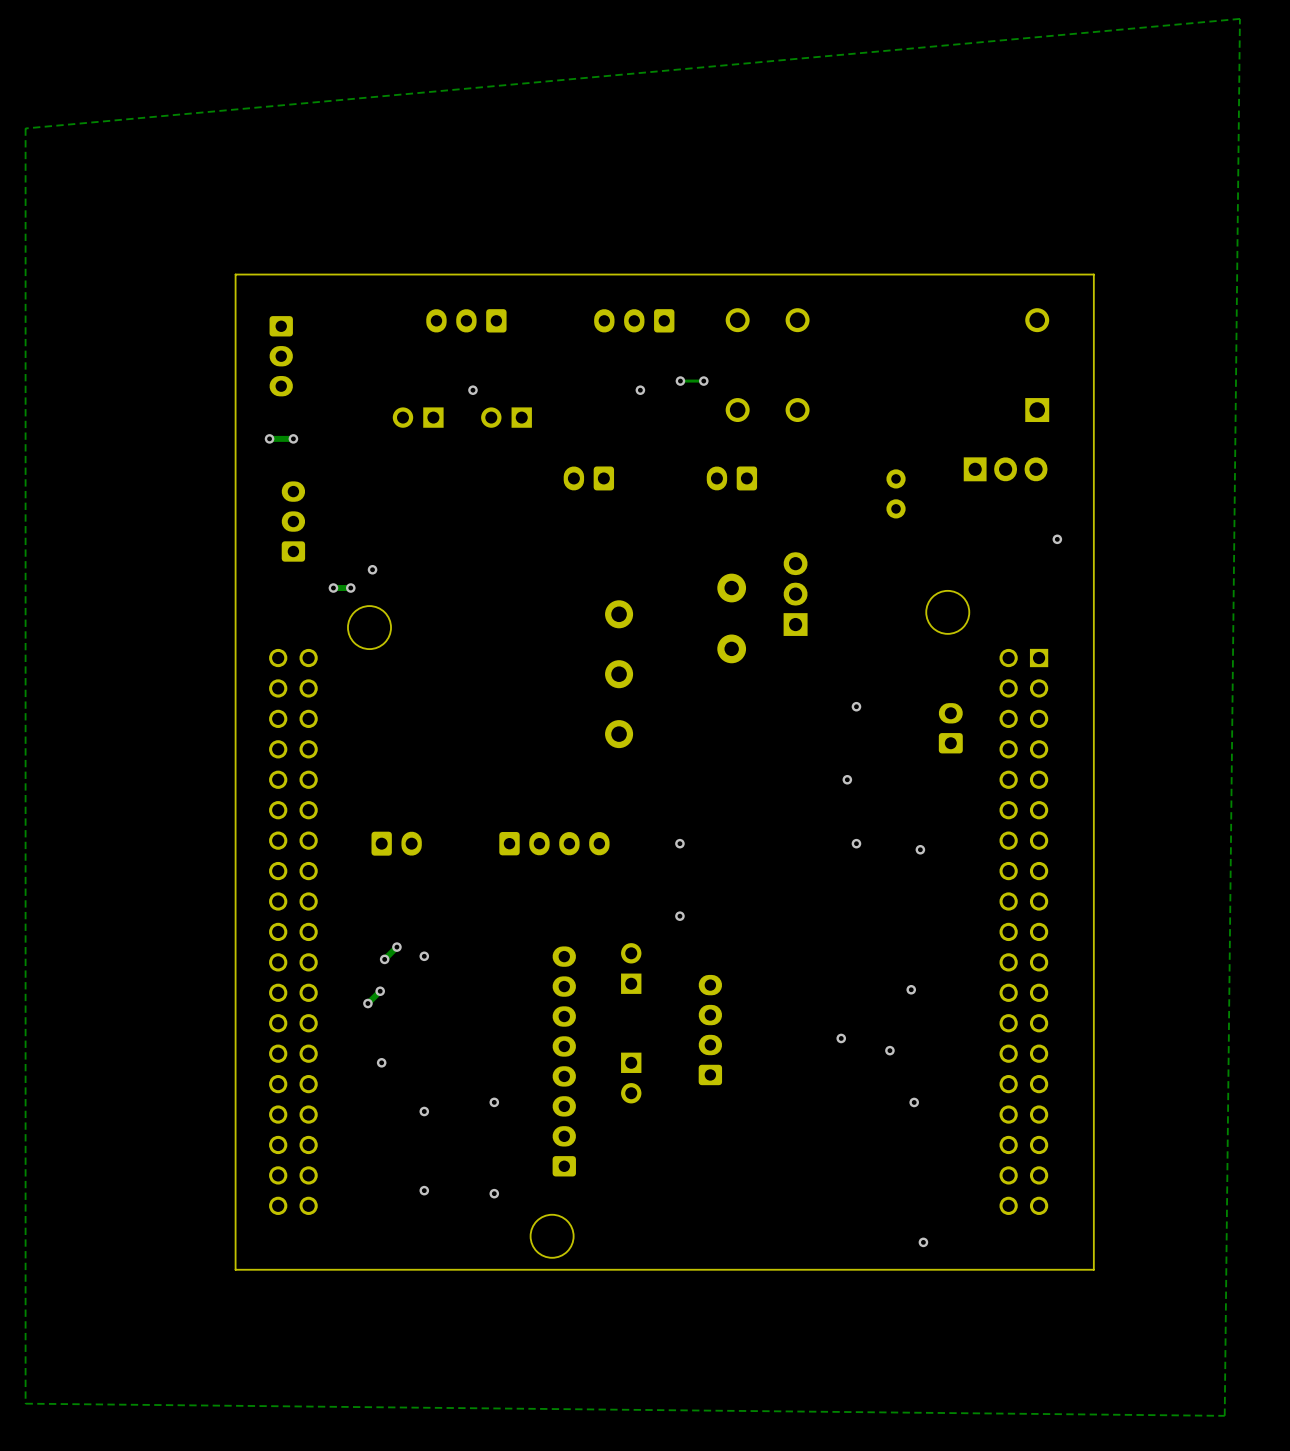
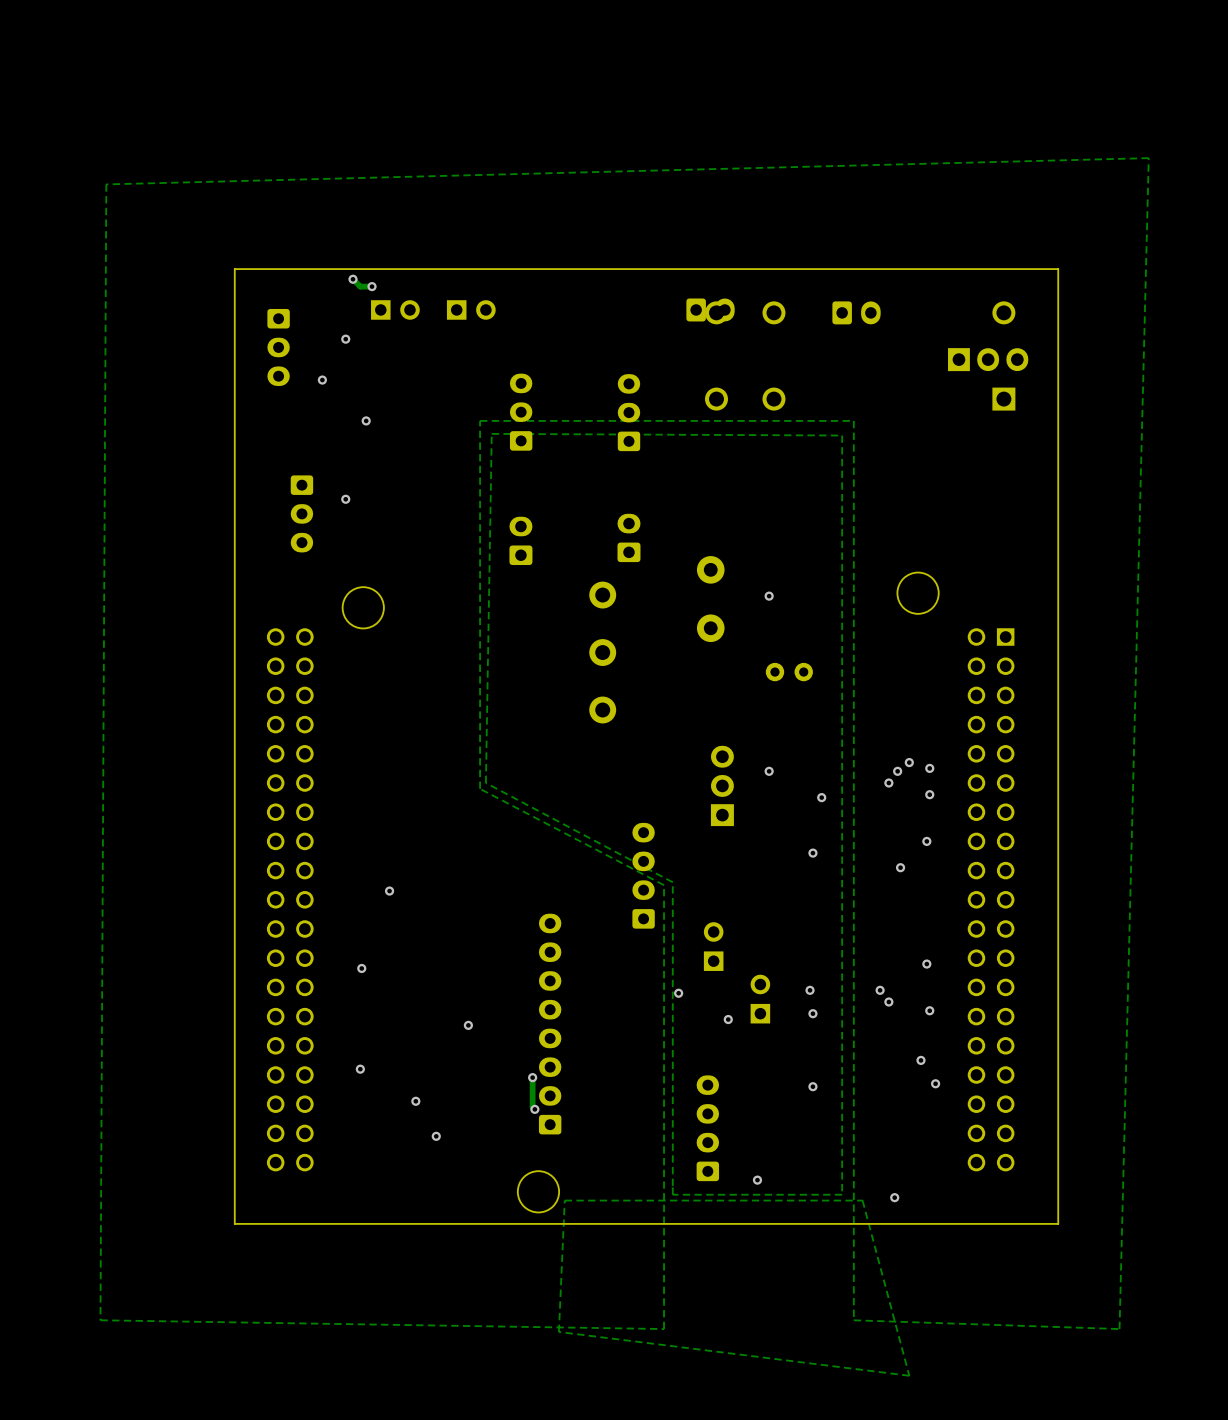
zone outline: (1239, 18) (1224, 1415) (25, 1403) (25, 128) (1239, 18) -> (1148, 158) (1119, 1329) (853, 1320) (853, 420) (480, 420) (480, 788) (664, 885) (664, 1329) (100, 1320) (106, 184) (1148, 158)
track: none -> (353, 279) (360, 286) (372, 286)
via: none -> (353, 279)
via: none -> (372, 286)
part: none -> (395, 309)
part: none -> (471, 309)
part: none -> (710, 309)
part: (466, 320) -> none
part: (634, 320) -> none
part: none -> (856, 312)
via: none -> (345, 339)
via: (680, 381) -> none
track: (703, 381) (680, 381) -> none
via: (703, 381) -> none
via: none -> (322, 380)
via: (472, 390) -> none
via: (640, 390) -> none
part: (418, 417) -> none
part: (506, 417) -> none
part: none -> (521, 412)
part: none -> (628, 412)
via: none -> (366, 420)
via: (269, 438) -> none
track: (293, 438) (269, 438) -> none
via: (293, 438) -> none
zone outline: none -> (491, 433) (485, 783) (672, 882) (672, 1194) (842, 1194) (842, 435) (491, 433)
part position: (1005, 469) -> (988, 359)
part: (588, 478) -> none
part: (731, 478) -> none
part rotation: 0° (896, 493) -> 90° clockwise (789, 672)
part position: (896, 493) -> (789, 672)
via: none -> (345, 499)
part rotation: 0° (293, 521) -> 180° (301, 513)
via: (1057, 539) -> none
part: none -> (628, 537)
part: none -> (520, 540)
via: (372, 569) -> none
via: (333, 588) -> none
track: (350, 588) (333, 588) -> none
via: (350, 588) -> none
part: (795, 594) -> none
via: none -> (769, 596)
via: (856, 706) -> none
part: (950, 728) -> none
via: (847, 779) -> none
via: none -> (909, 762)
via: none -> (929, 768)
via: none -> (769, 771)
via: none -> (897, 771)
via: none -> (888, 783)
part: none -> (722, 785)
via: none -> (929, 794)
part: (396, 843) -> none
part: (554, 843) -> none
via: (679, 843) -> none
via position: (856, 843) -> (821, 797)
via: (920, 849) -> none
via: none -> (926, 841)
via: none -> (812, 853)
via: none -> (900, 867)
part: none -> (643, 875)
via: (679, 916) -> none
via: none -> (389, 891)
track: (396, 947) (384, 959) -> none
via: (396, 947) -> none
via: (424, 956) -> none
via: (384, 959) -> none
part: (631, 968) -> none
part: none -> (713, 946)
via: (911, 989) -> none
track: (380, 991) (367, 1003) -> none
via: (380, 991) -> none
via: none -> (926, 964)
via: none -> (810, 990)
via: none -> (880, 990)
via: none -> (678, 993)
part: (710, 1030) -> none
part: none -> (760, 999)
via: (841, 1038) -> none
via: none -> (888, 1002)
via: none -> (929, 1010)
via: none -> (812, 1013)
via: (889, 1050) -> none
via: none -> (728, 1019)
via: (381, 1062) -> none
via: none -> (468, 1025)
part: (631, 1078) -> none
via: none -> (920, 1060)
via: (494, 1102) -> none
via: (914, 1102) -> none
via: none -> (360, 1069)
via: (424, 1111) -> none
track: none -> (532, 1077) (532, 1107) (534, 1109)
via: none -> (532, 1077)
via: none -> (935, 1083)
via: none -> (812, 1086)
via: none -> (415, 1101)
via: none -> (534, 1109)
part: none -> (707, 1128)
via: none -> (436, 1136)
via: (424, 1190) -> none
via: (494, 1193) -> none
via: none -> (757, 1180)
zone outline: none -> (862, 1200) (564, 1200) (558, 1331) (909, 1375) (862, 1200)

